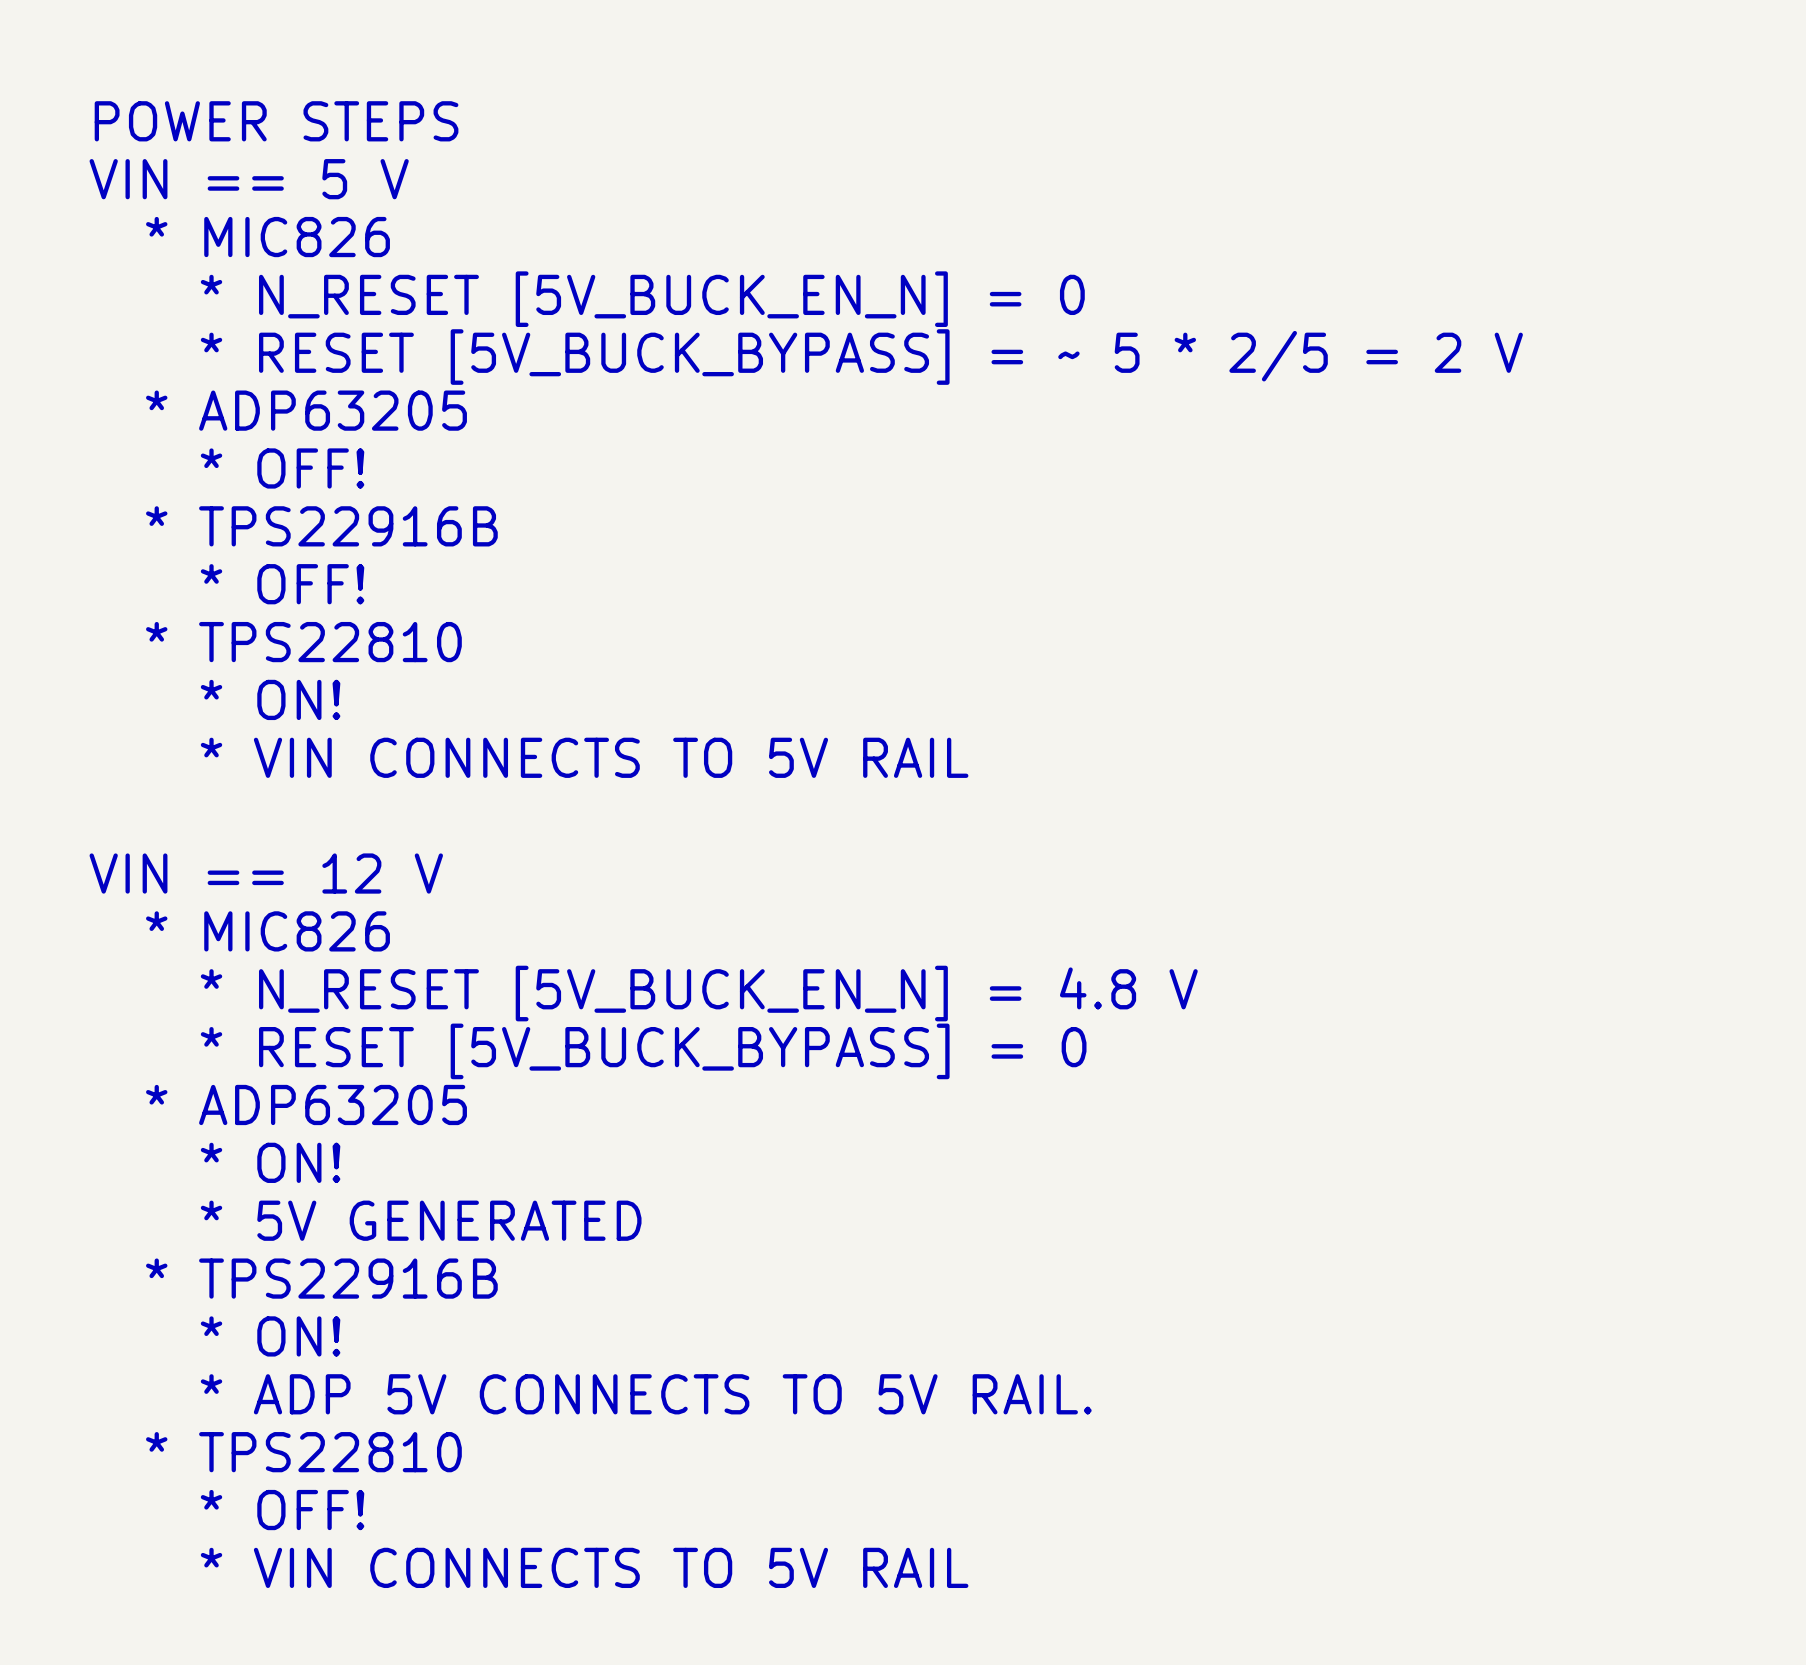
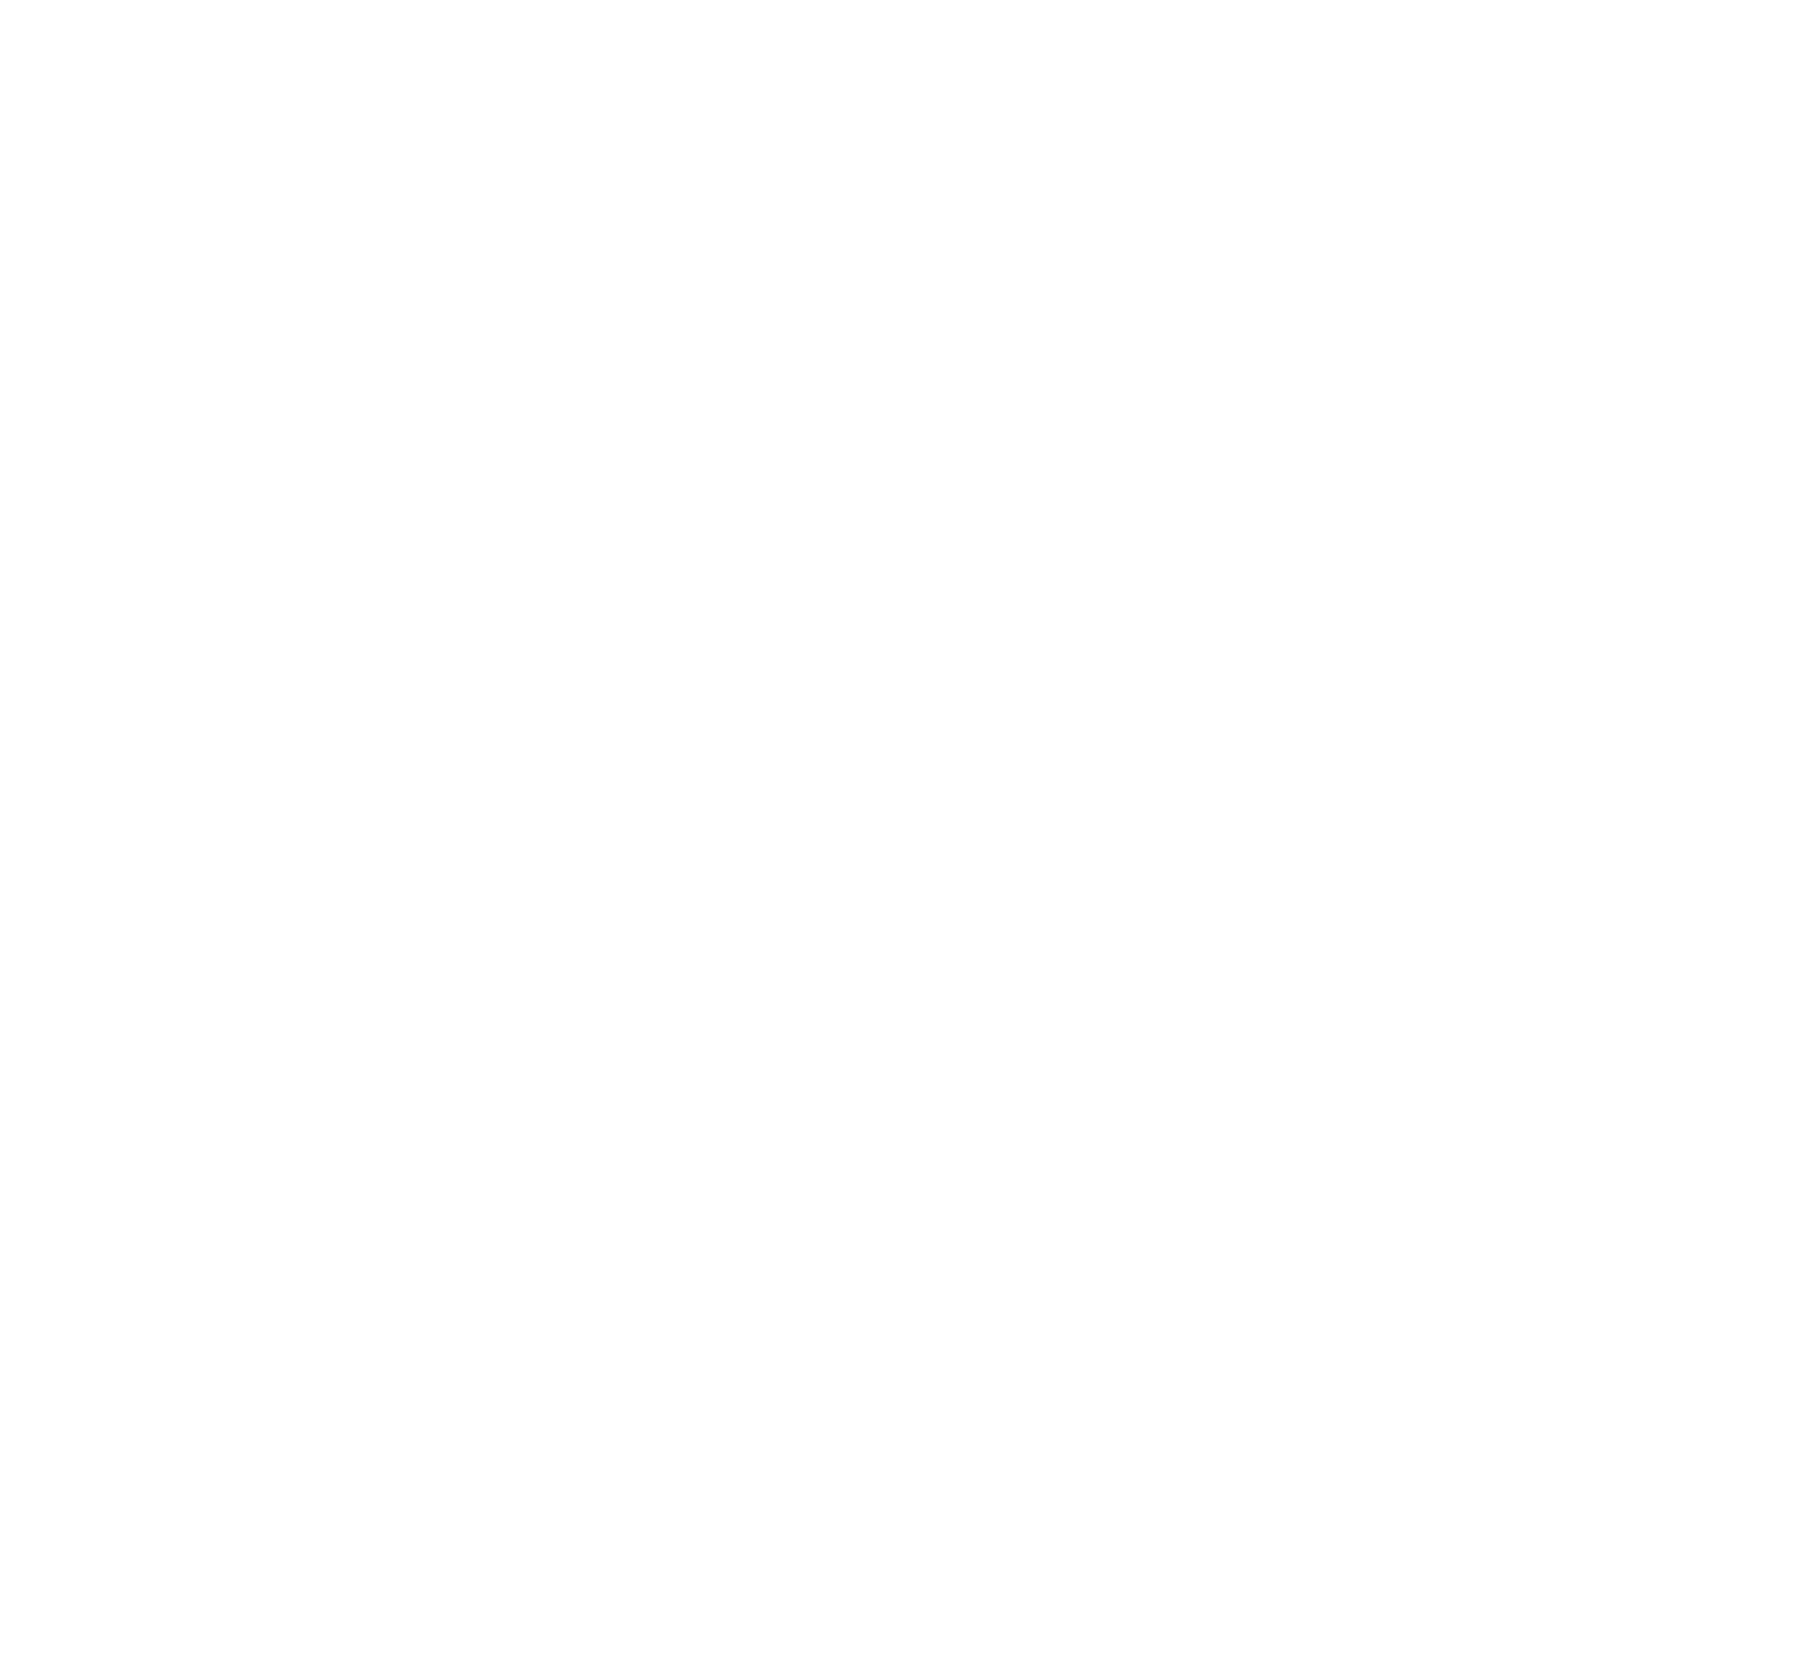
text: POWER STEPS (276, 121) -> none
text: VIN == 5 V (249, 179) -> none
text: * MIC826 (267, 237) -> none
text: * N_RESET [5V_BUCK_EN_N] = 0 (642, 299) -> none
text: * RESET [5V_BUCK_BYPASS] = ~ 5 * 2/5 = 2 V (861, 357) -> none
text: * ADP63205 (306, 410) -> none
text: * OFF! (282, 468) -> none
text: * TPS22916B (321, 526) -> none
text: * OFF! (282, 584) -> none
text: * TPS22810 (303, 642) -> none
text: * ON! (270, 699) -> none
text: * VIN CONNECTS TO 5V RAIL (584, 757) -> none
text: VIN == 12 V (266, 873) -> none
text: * MIC826 (267, 931) -> none
text: * N_RESET [5V_BUCK_EN_N] = 4.8 V (699, 993) -> none
text: * RESET [5V_BUCK_BYPASS] = 0 (643, 1051) -> none
text: * ADP63205 (306, 1104) -> none
text: * ON! (270, 1162) -> none
text: * 5V GENERATED (421, 1220) -> none
text: * TPS22916B (321, 1278) -> none
text: * ON! (270, 1336) -> none
text: * ADP 5V CONNECTS TO 5V RAIL. (646, 1394) -> none
text: * TPS22810 (303, 1452) -> none
text: * OFF! (282, 1510) -> none
text: * VIN CONNECTS TO 5V RAIL (584, 1567) -> none

